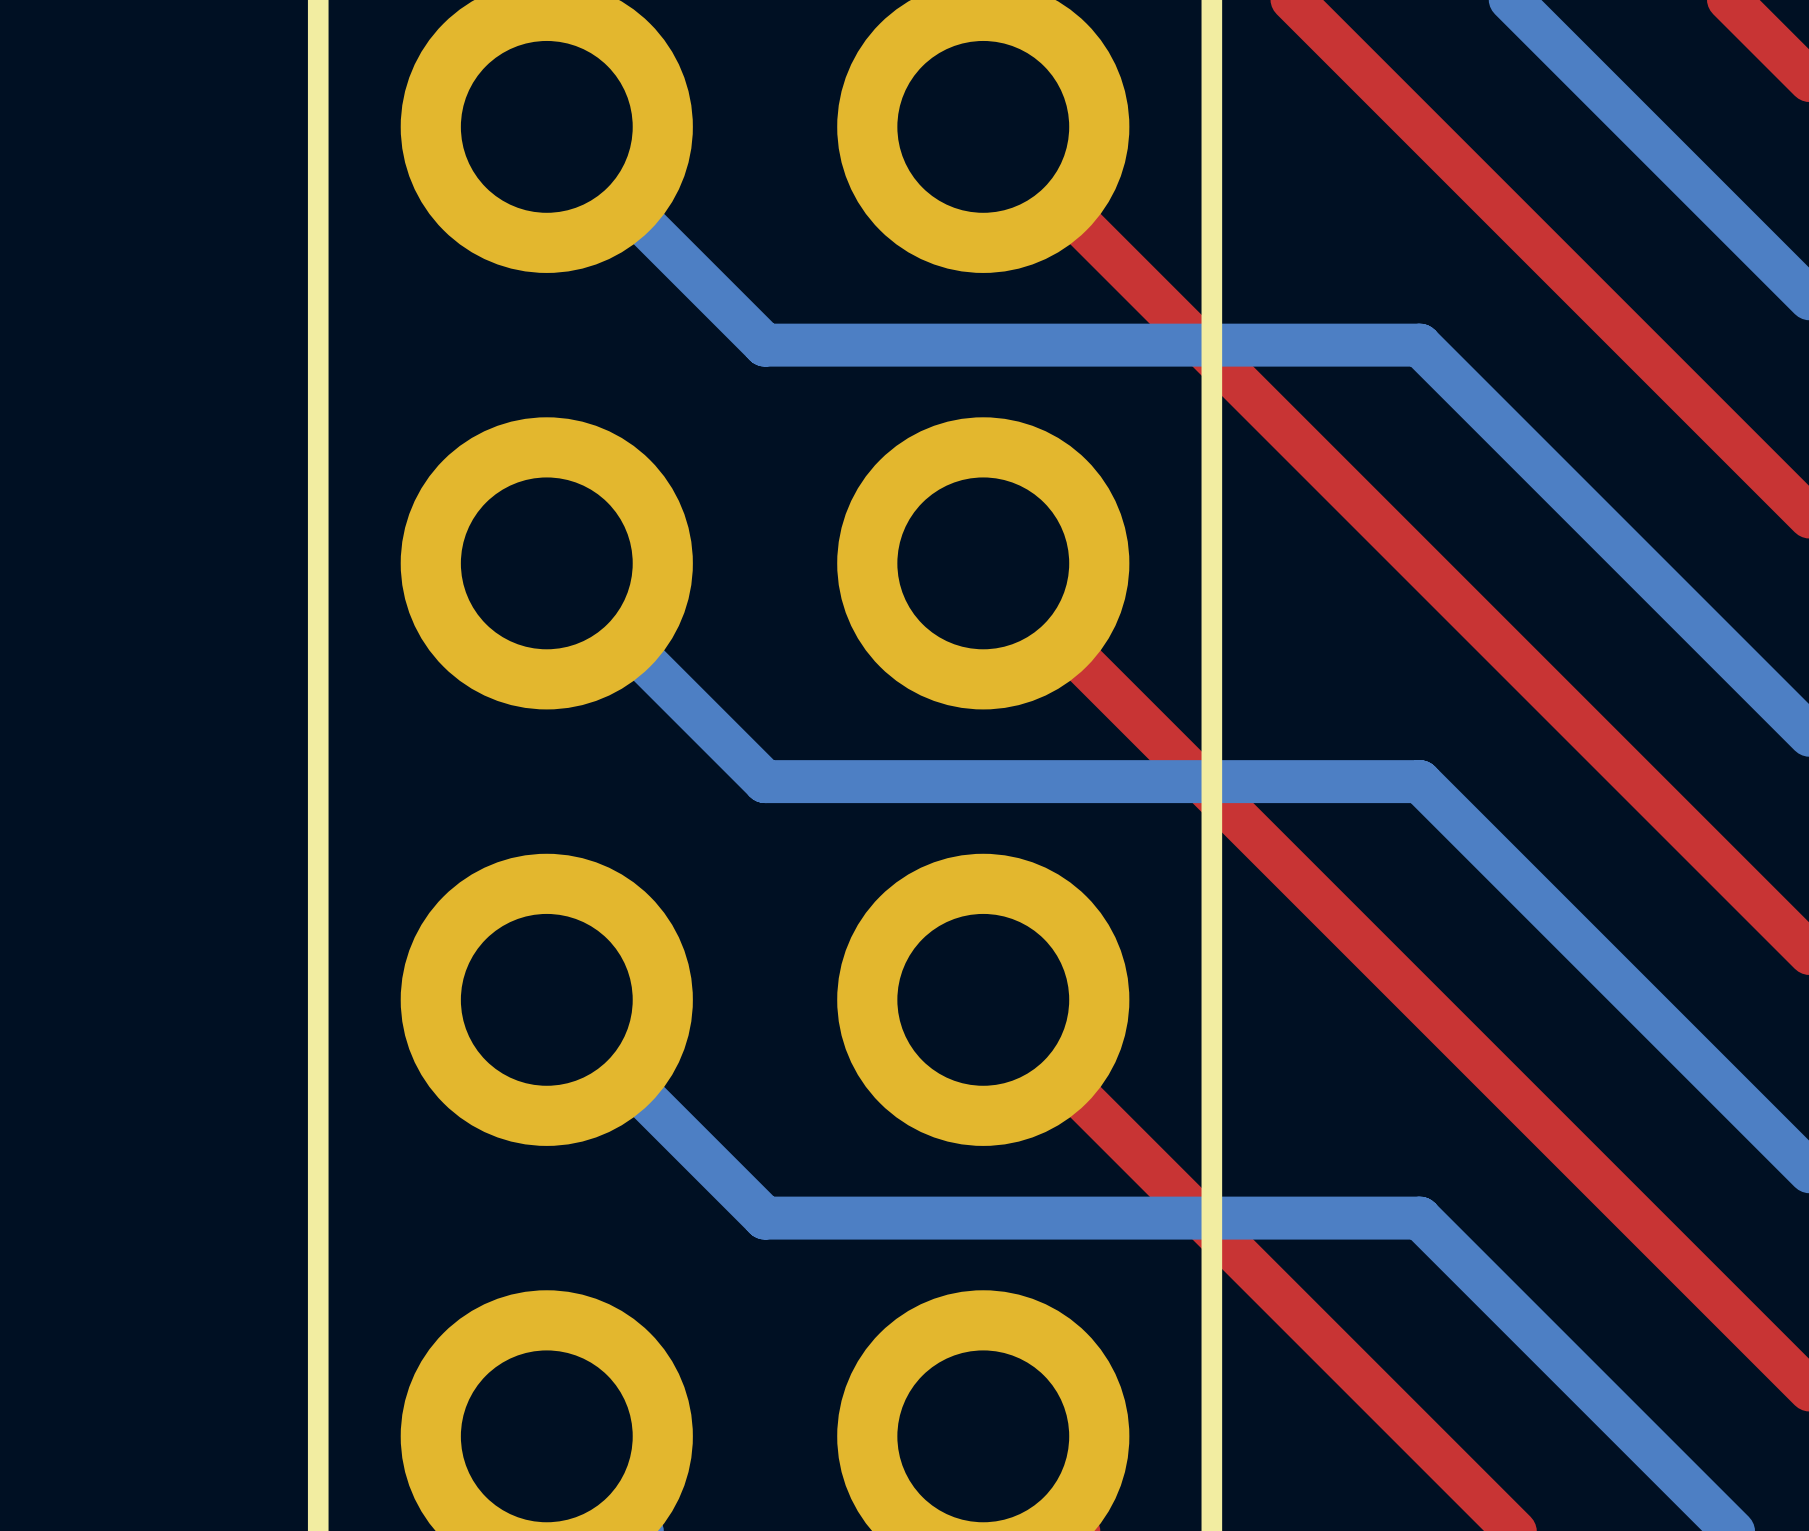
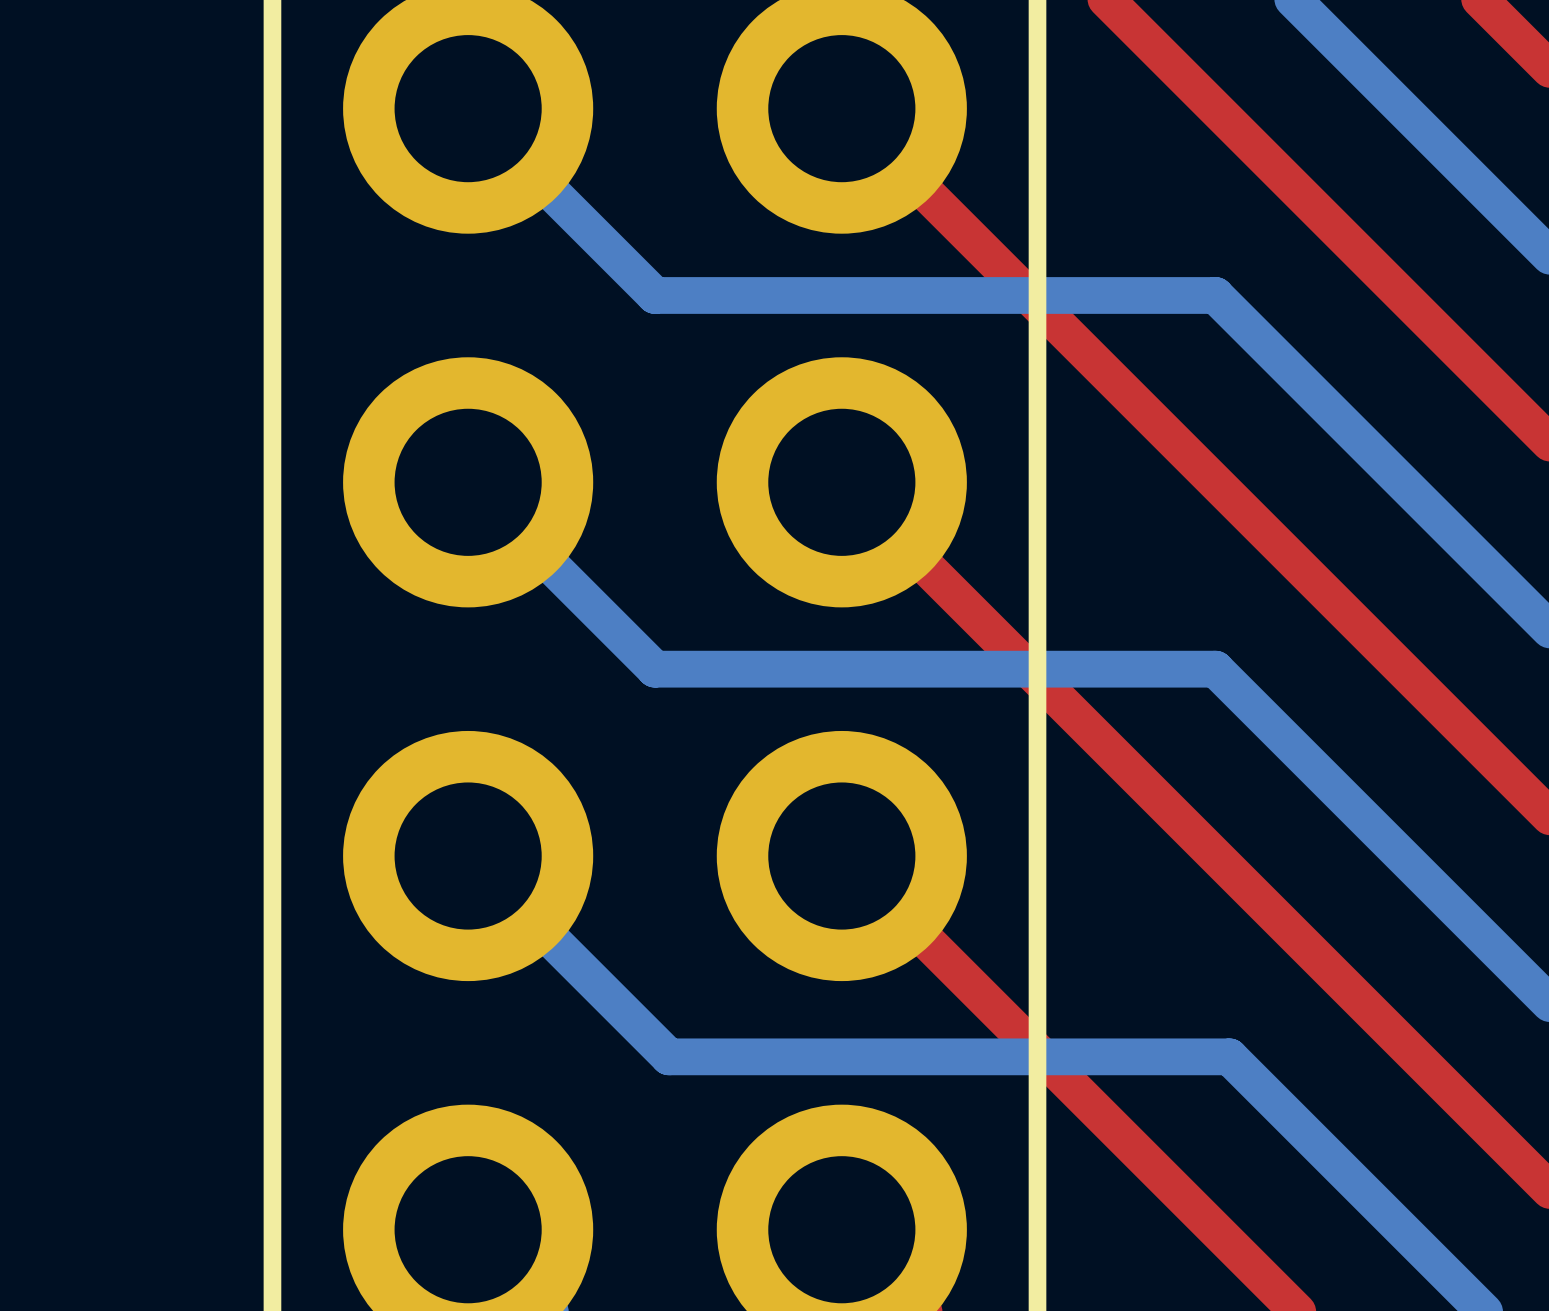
bottom track: (765, 1218) (1419, 1218) (1436, 1234) -> (654, 1042) (668, 1056) (1229, 1056)

